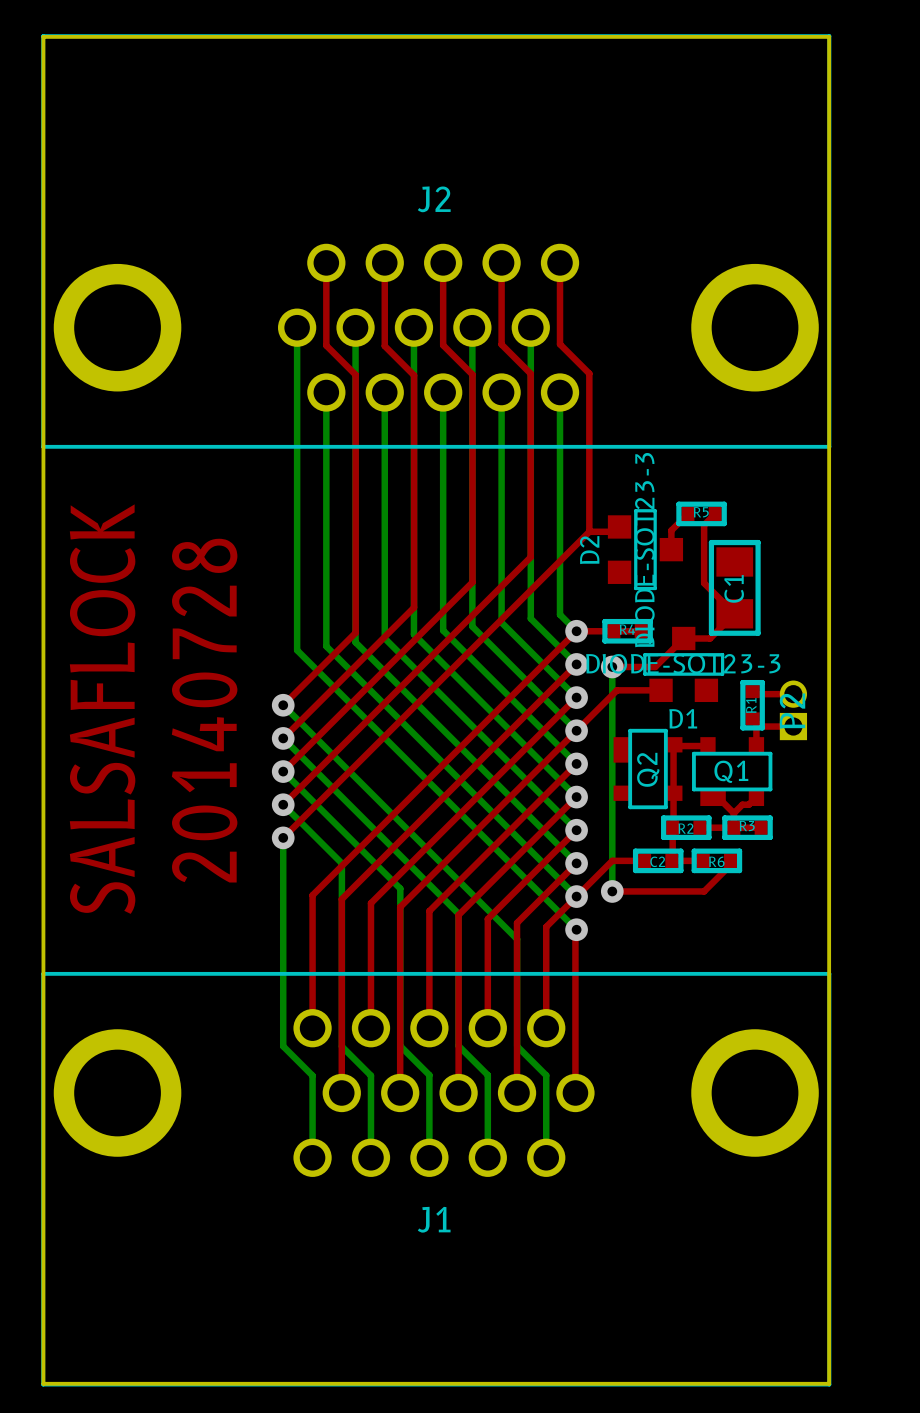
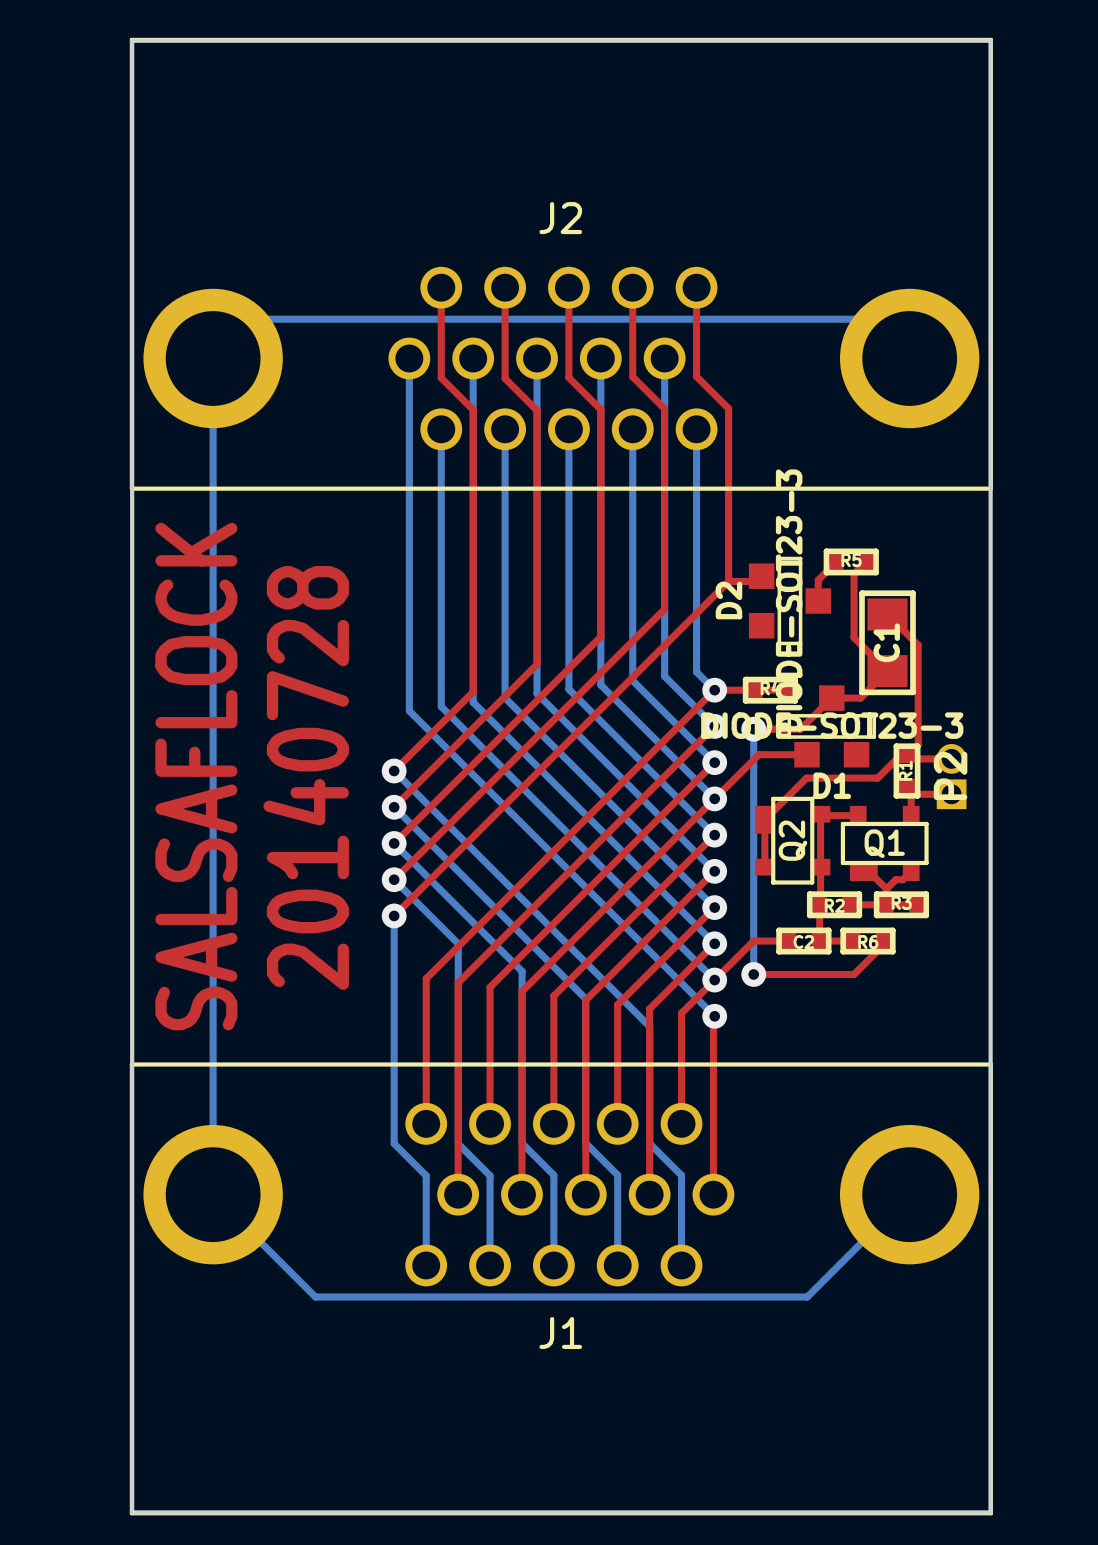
bottom track: none -> (909, 358) (870, 319) (252, 319) (213, 358) (213, 1194) (315, 1296) (807, 1296) (909, 1194)
top track: none -> (887, 614) (918, 645) (918, 744) (907, 756) (899, 756) (877, 778) (806, 778) (764, 819) (764, 867)

